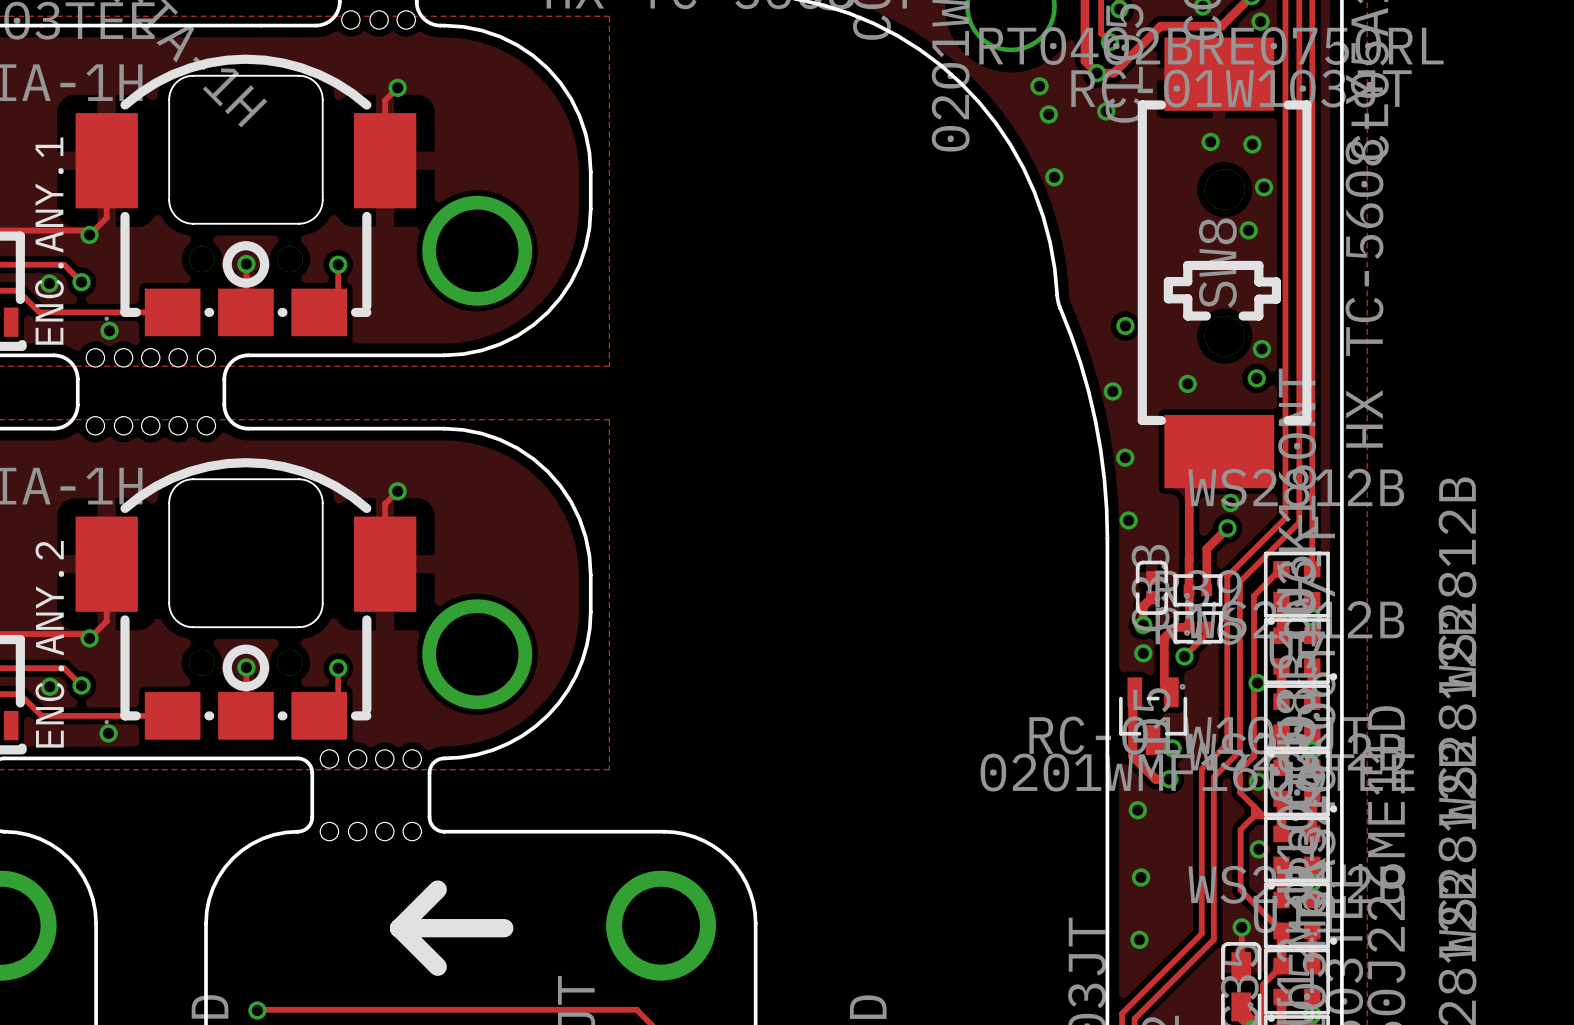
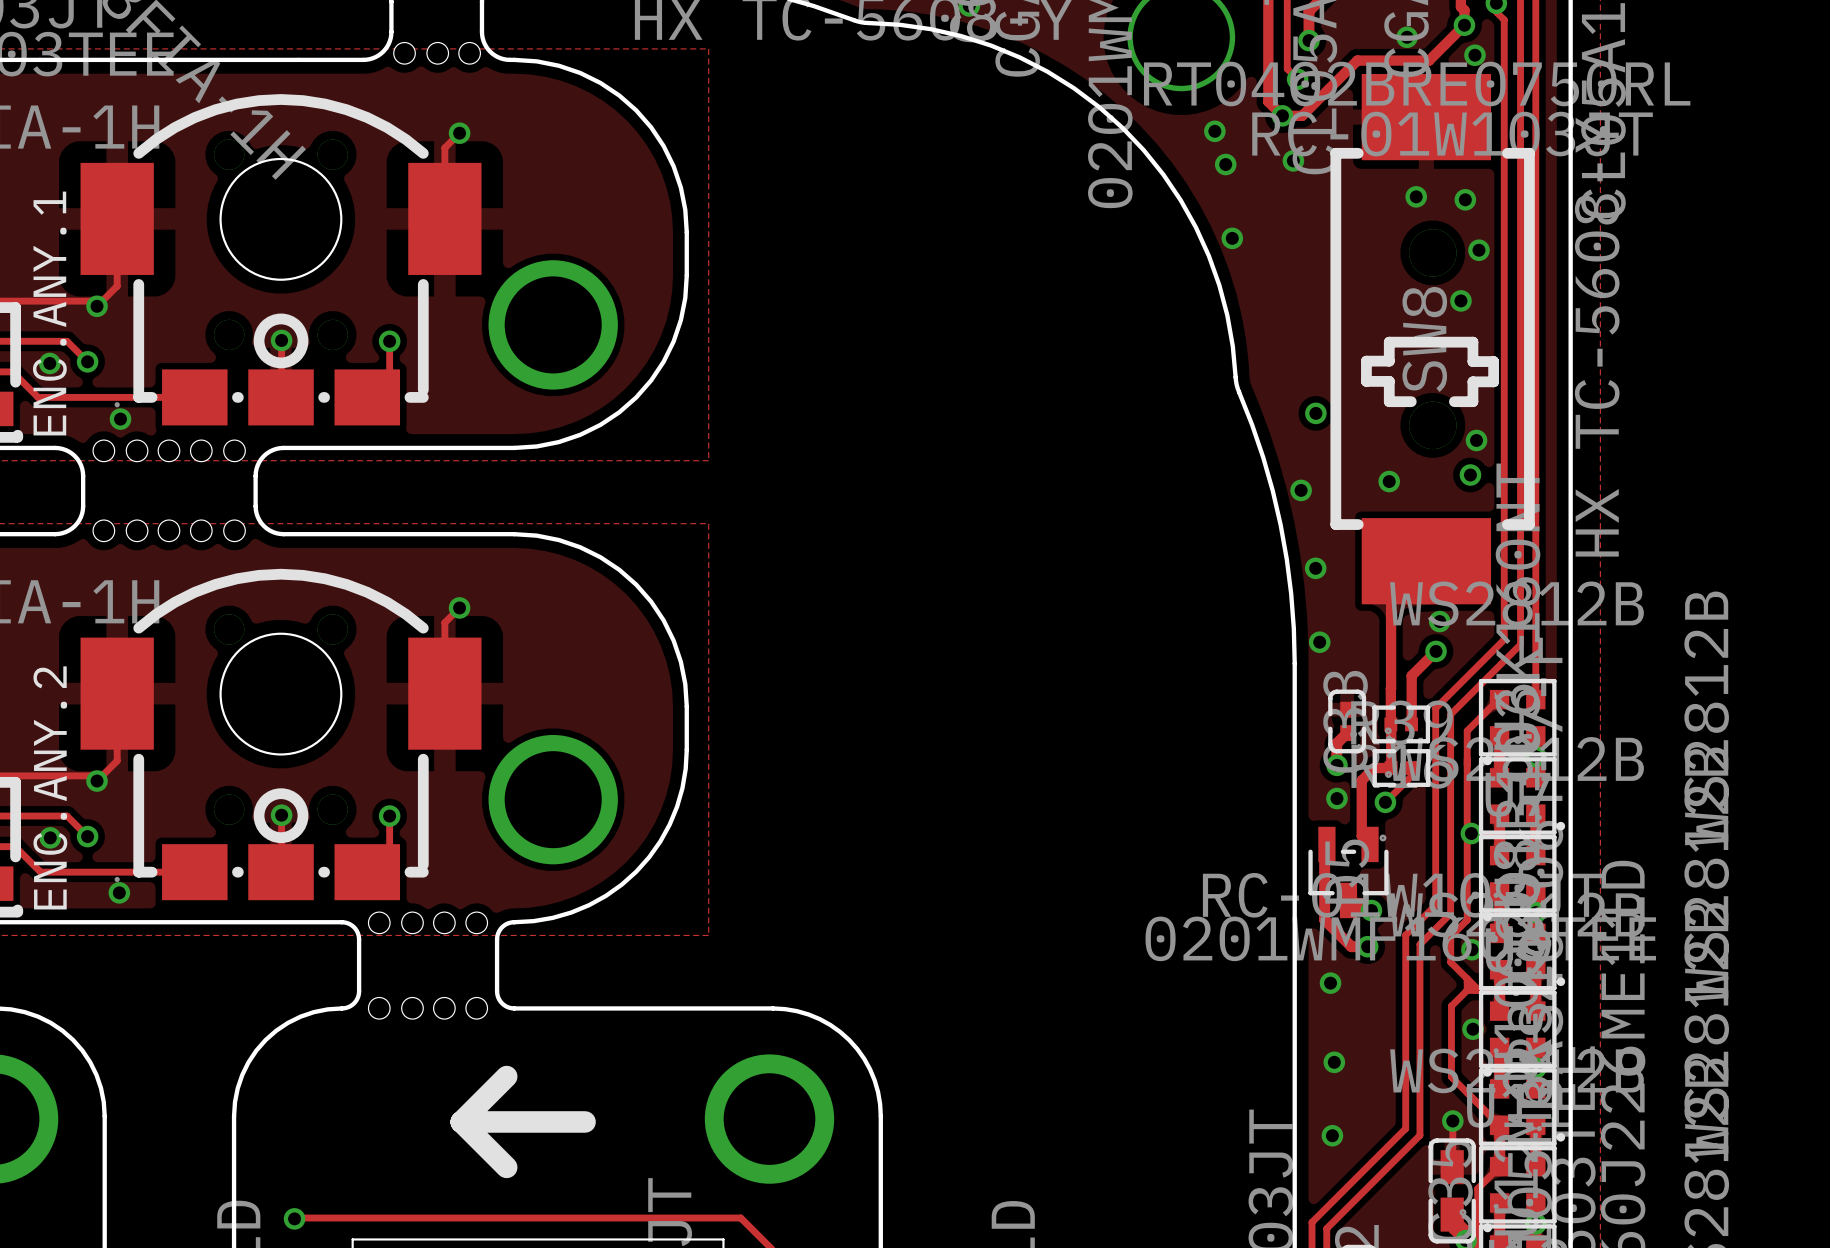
part footprint: [75, 54, 417, 337] -> [80, 94, 482, 426]
part footprint: [75, 458, 417, 740] -> [80, 568, 482, 901]

